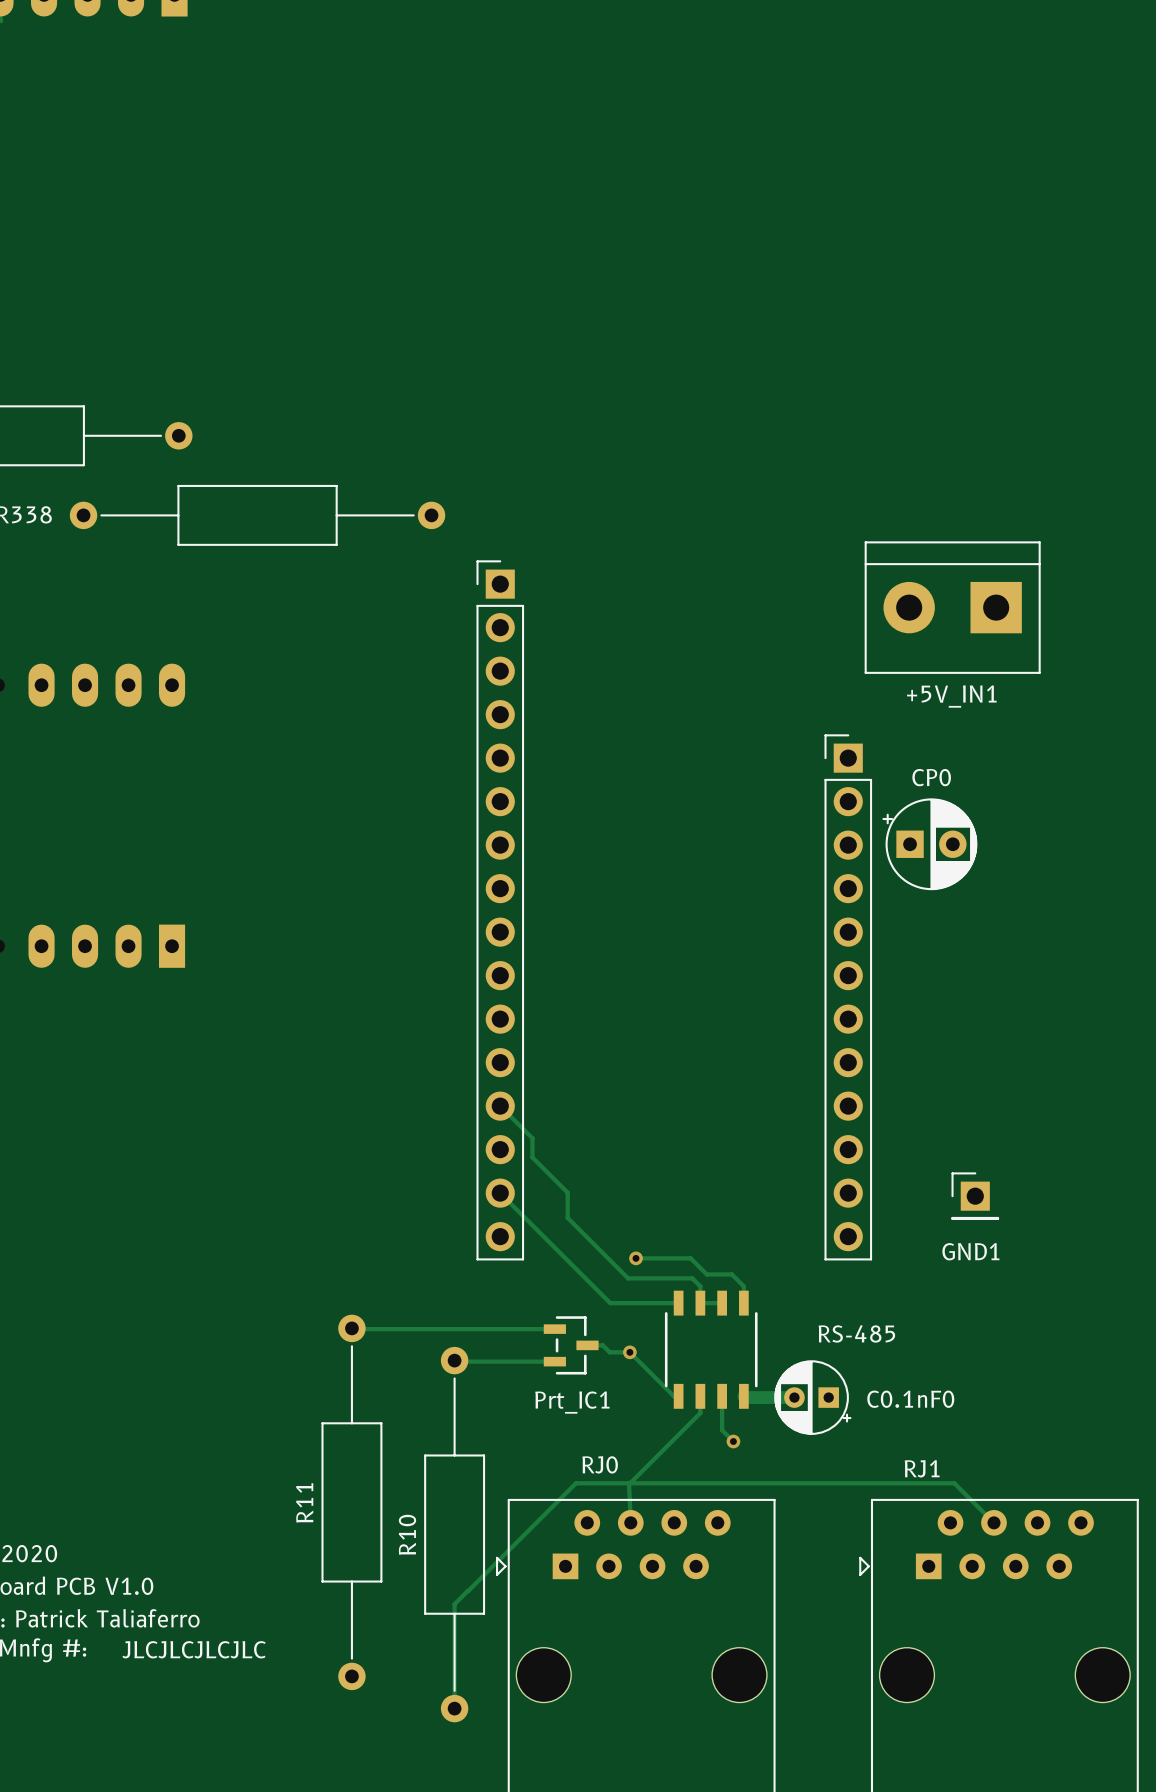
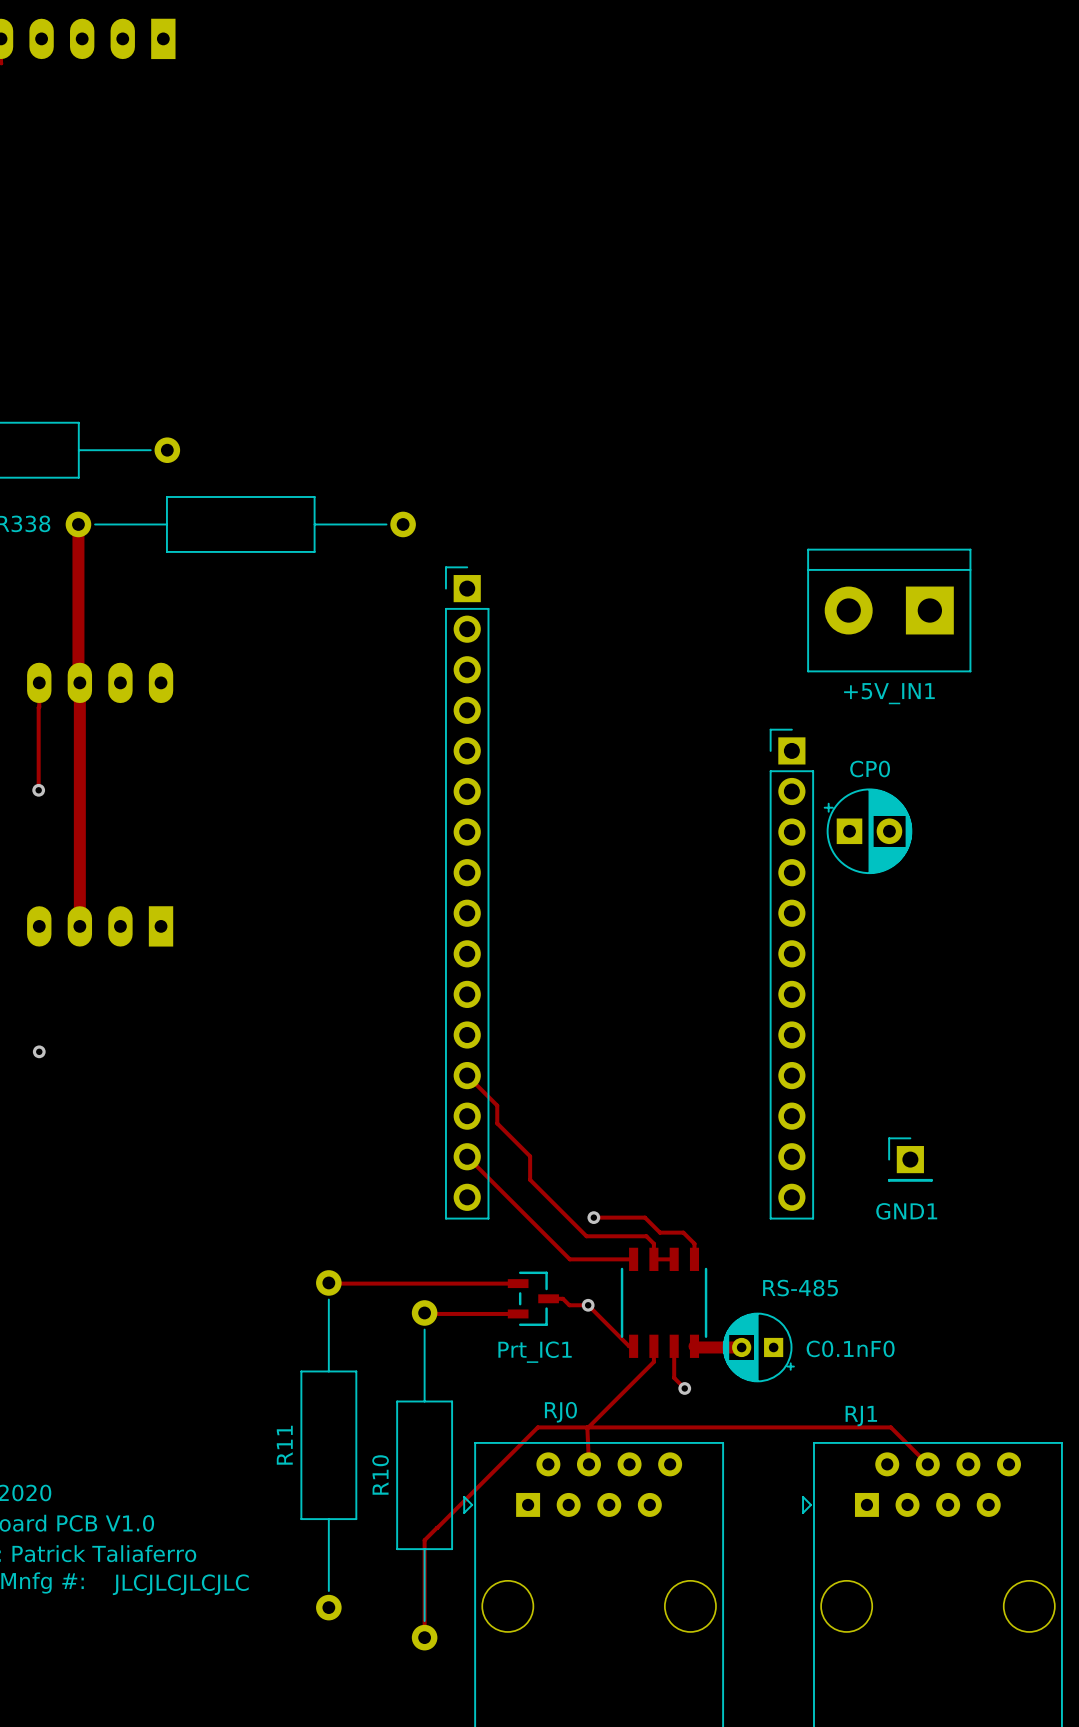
track: none -> (78, 524) (79, 926)
track: none -> (39, 682) (38, 790)
via: none -> (38, 790)
via: none -> (39, 1051)

